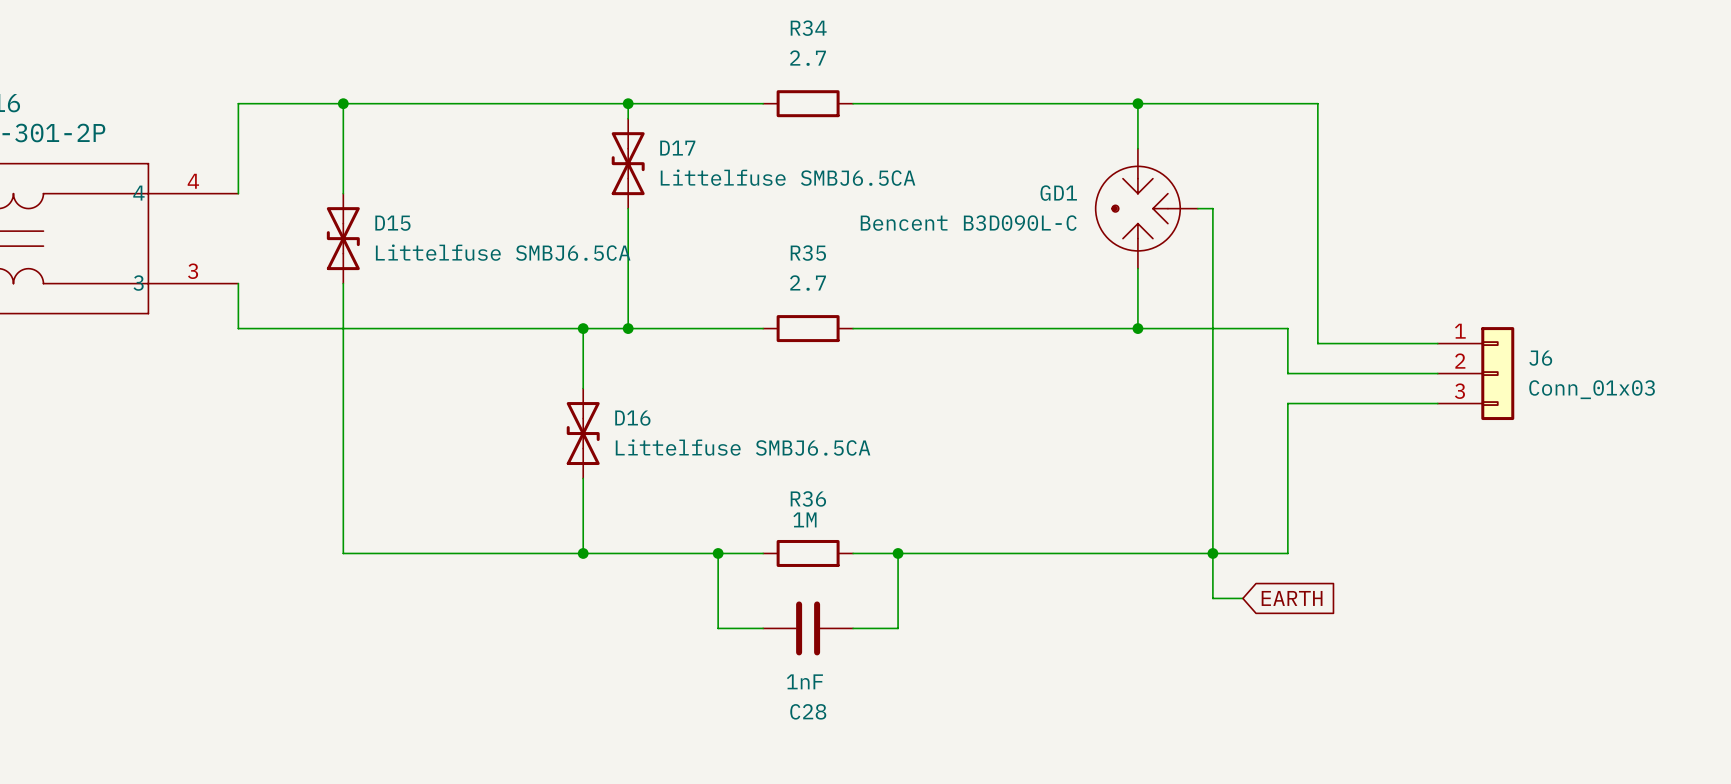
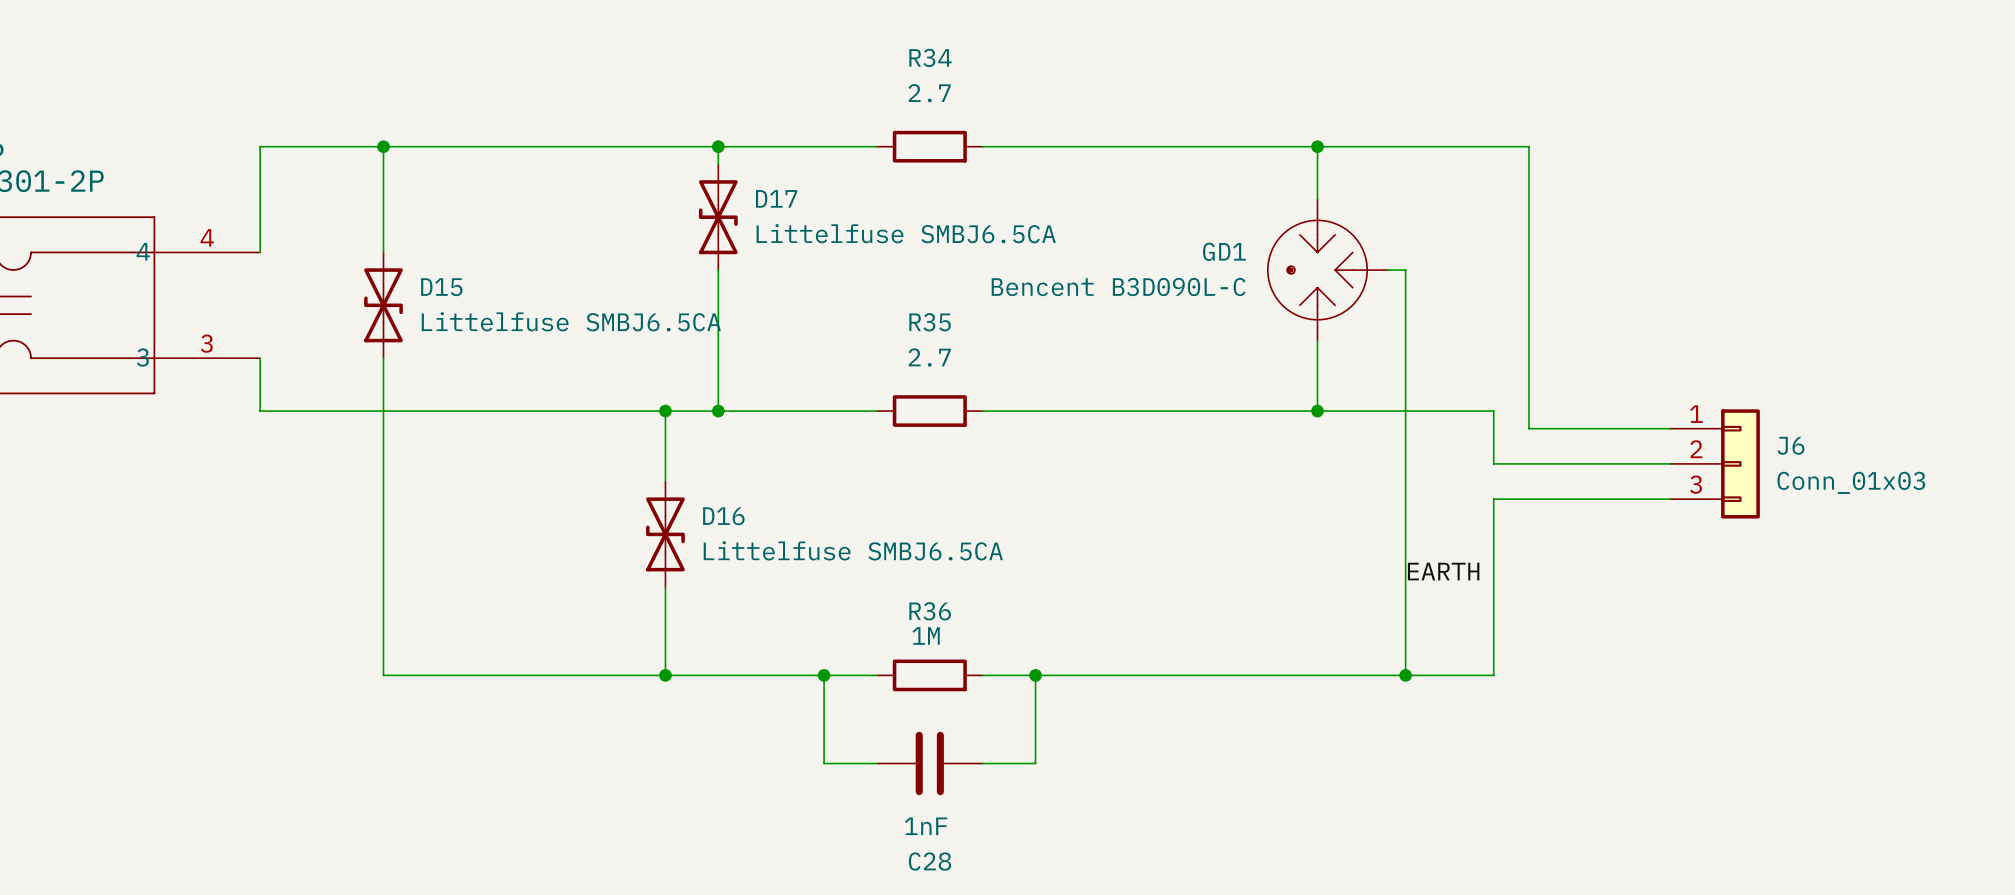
label: none -> EARTH (1443, 571)
wire: (1212, 553) (1212, 598) (1242, 598) -> none
global label: EARTH (1292, 598) -> none

